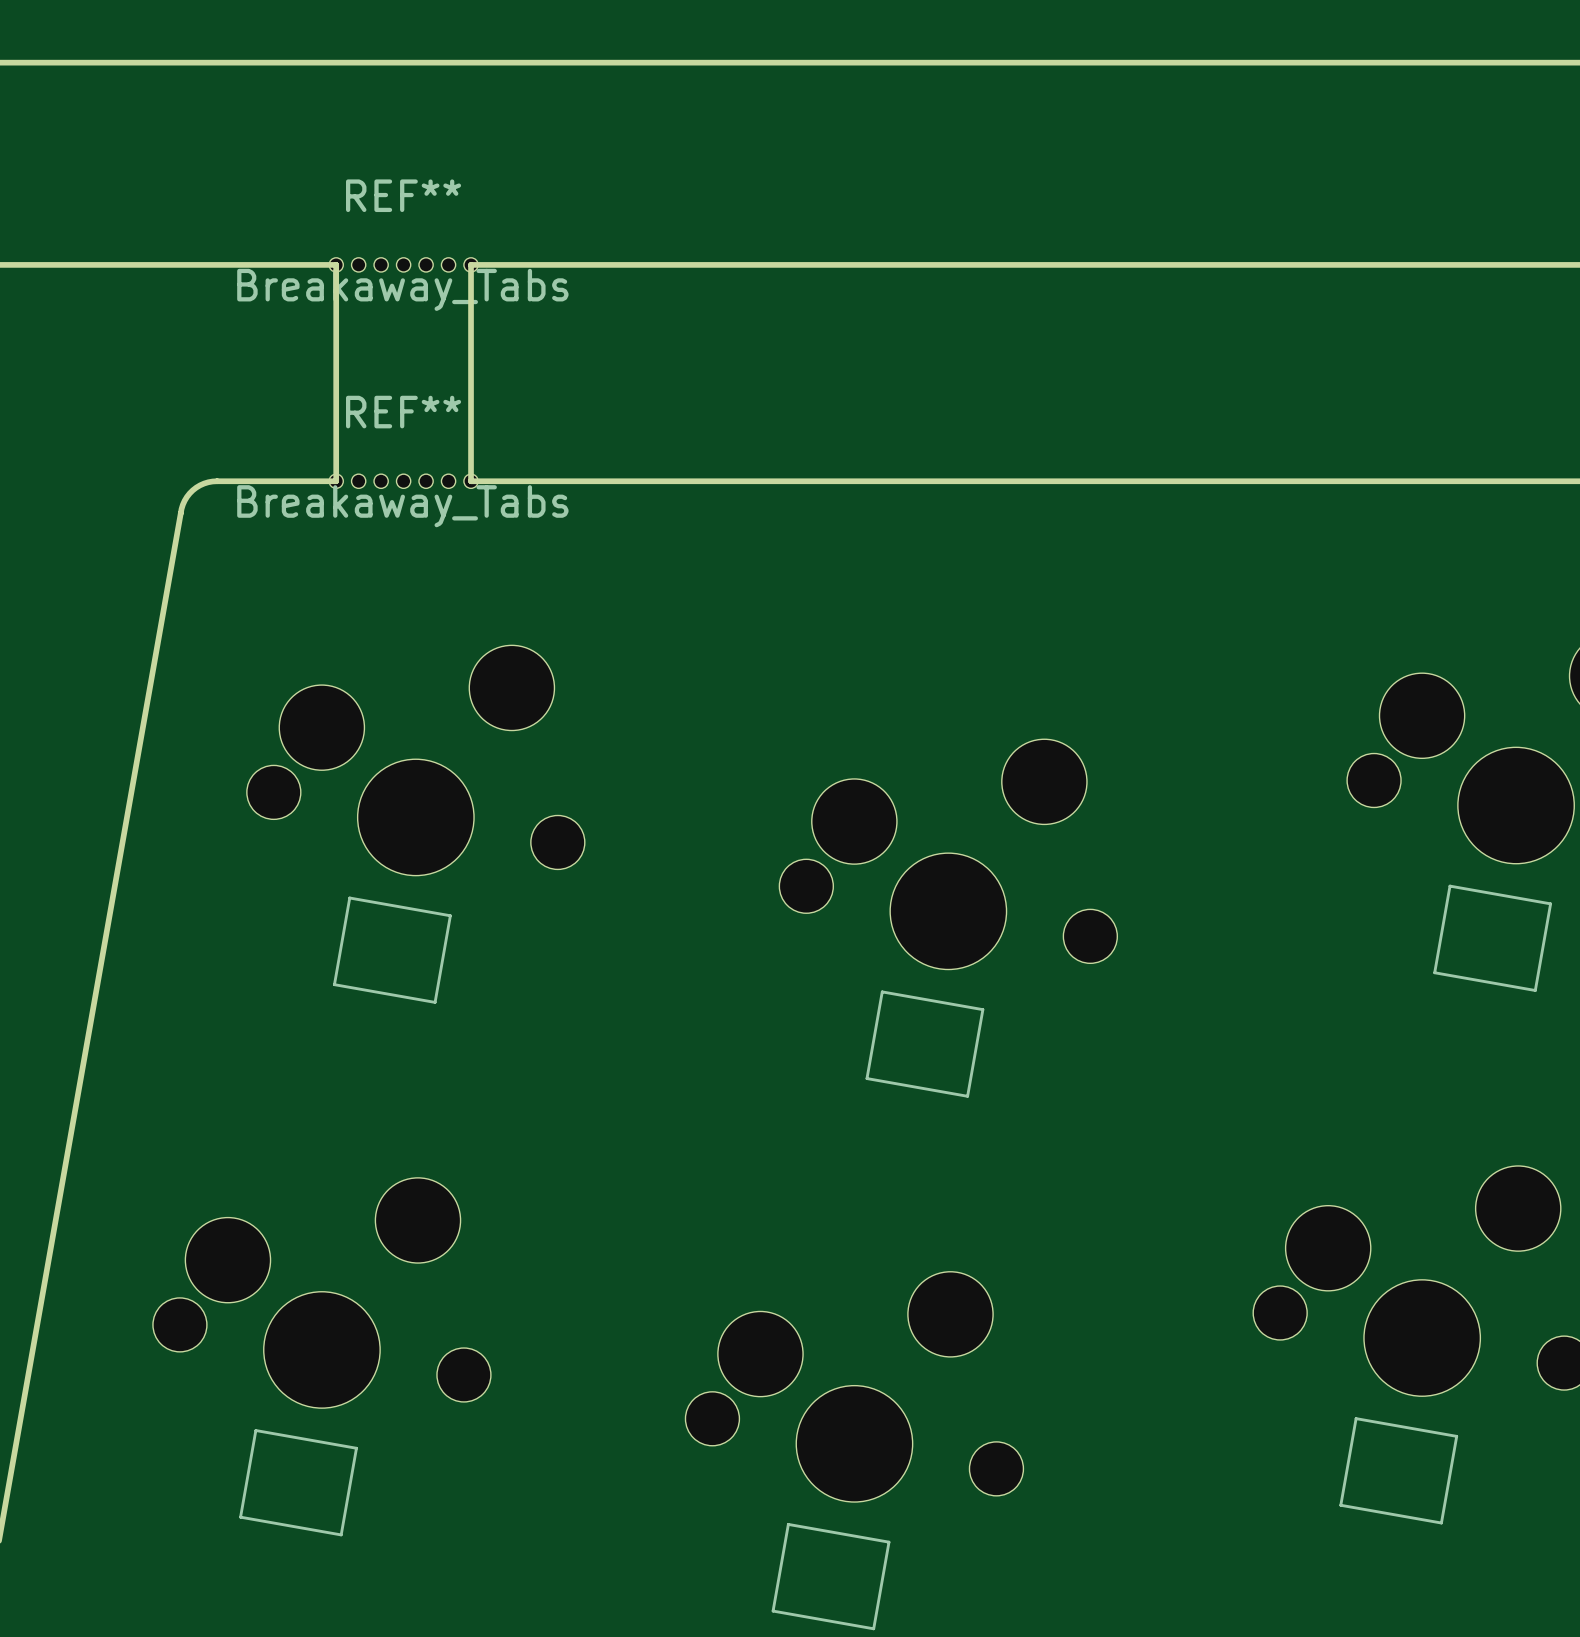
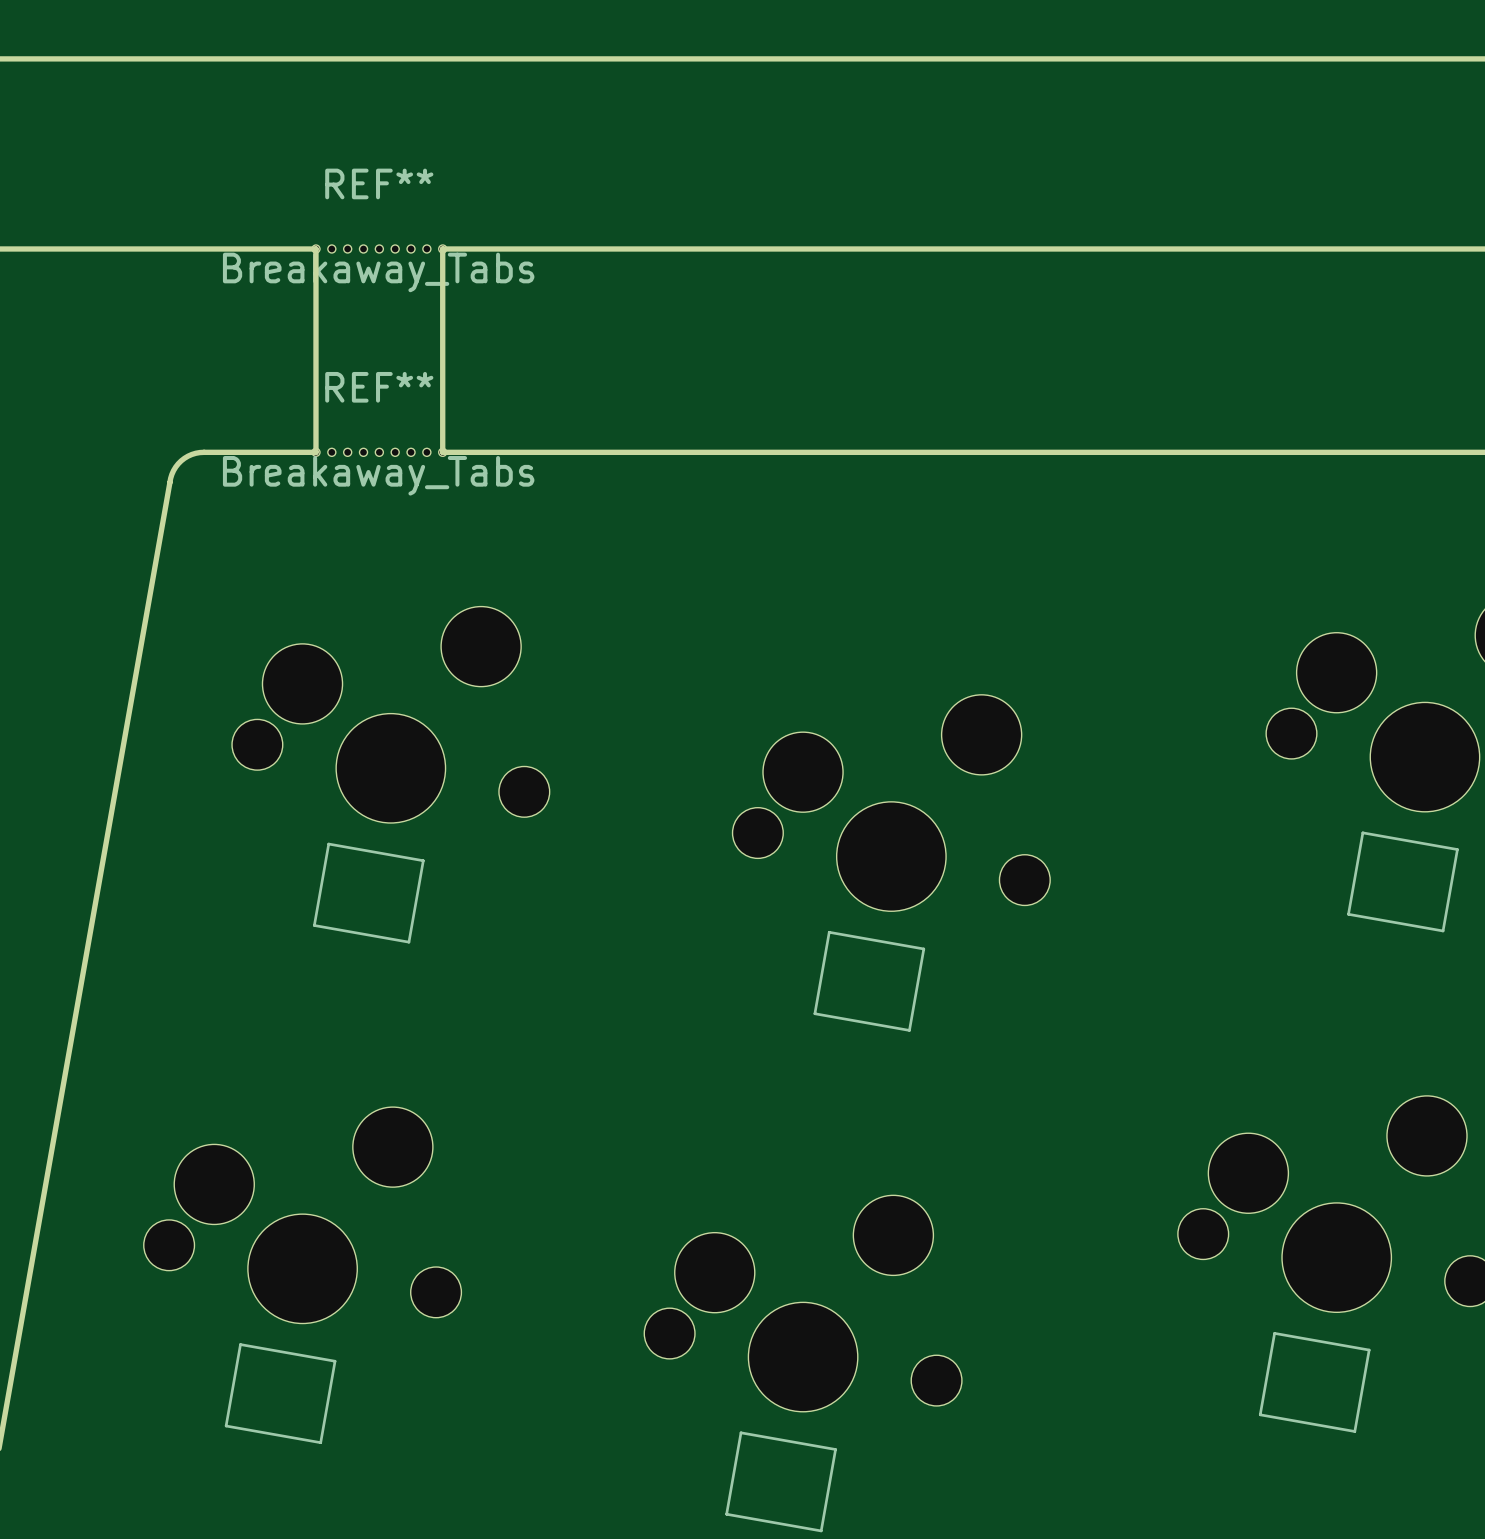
REF** footprint: [329, 257, 479, 273] -> [311, 244, 447, 253]
REF** footprint: [329, 474, 479, 489] -> [311, 448, 447, 457]

